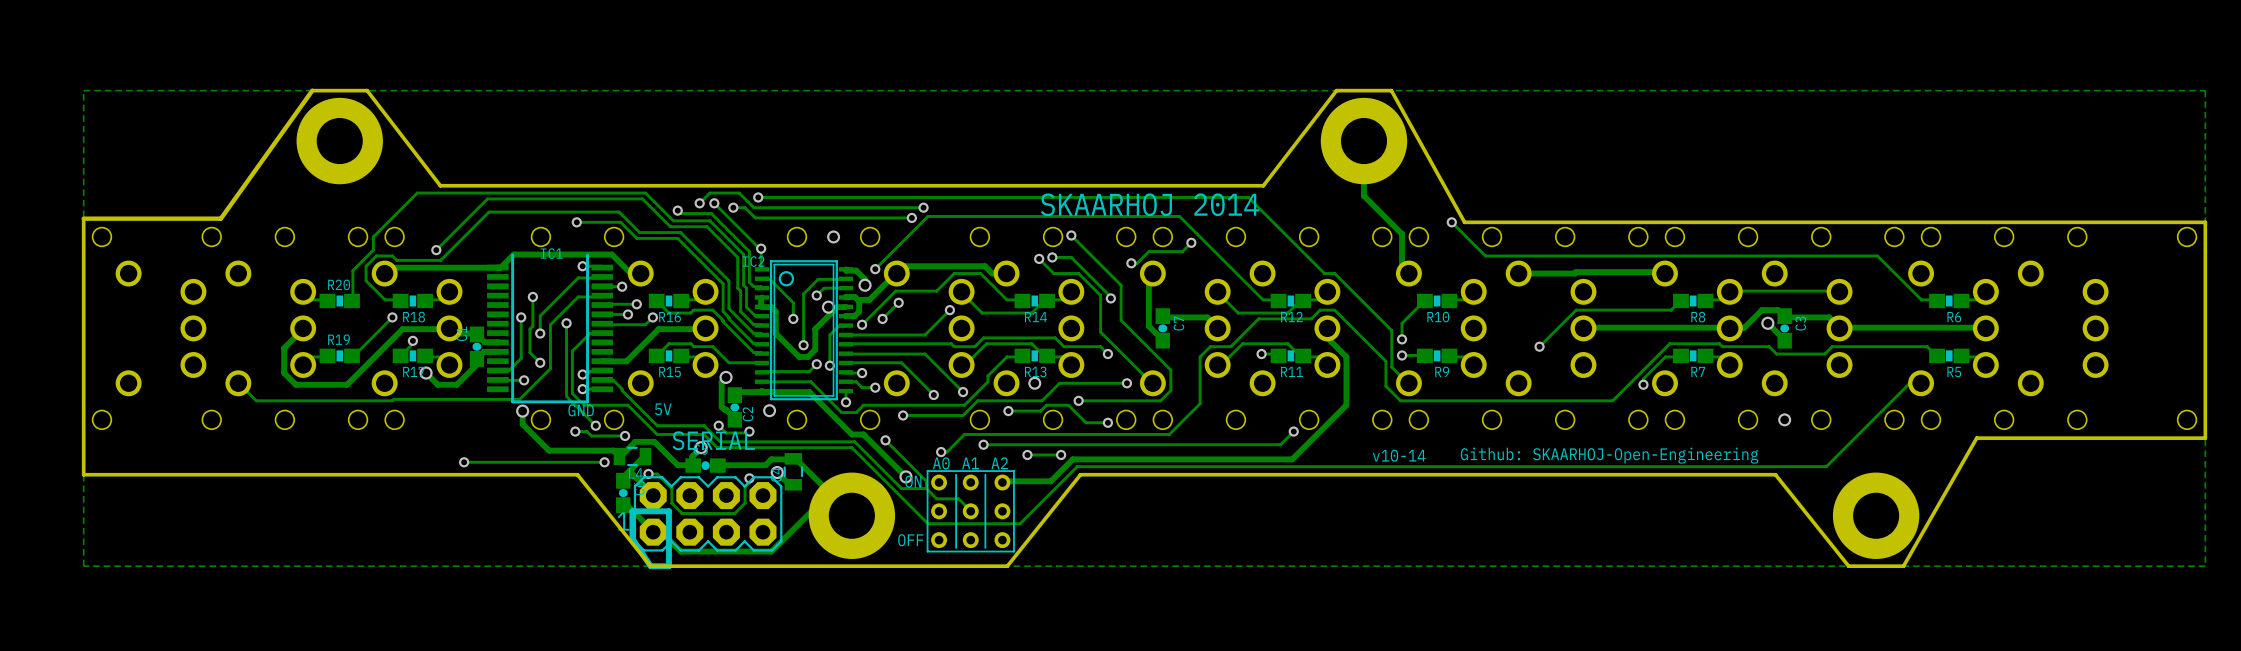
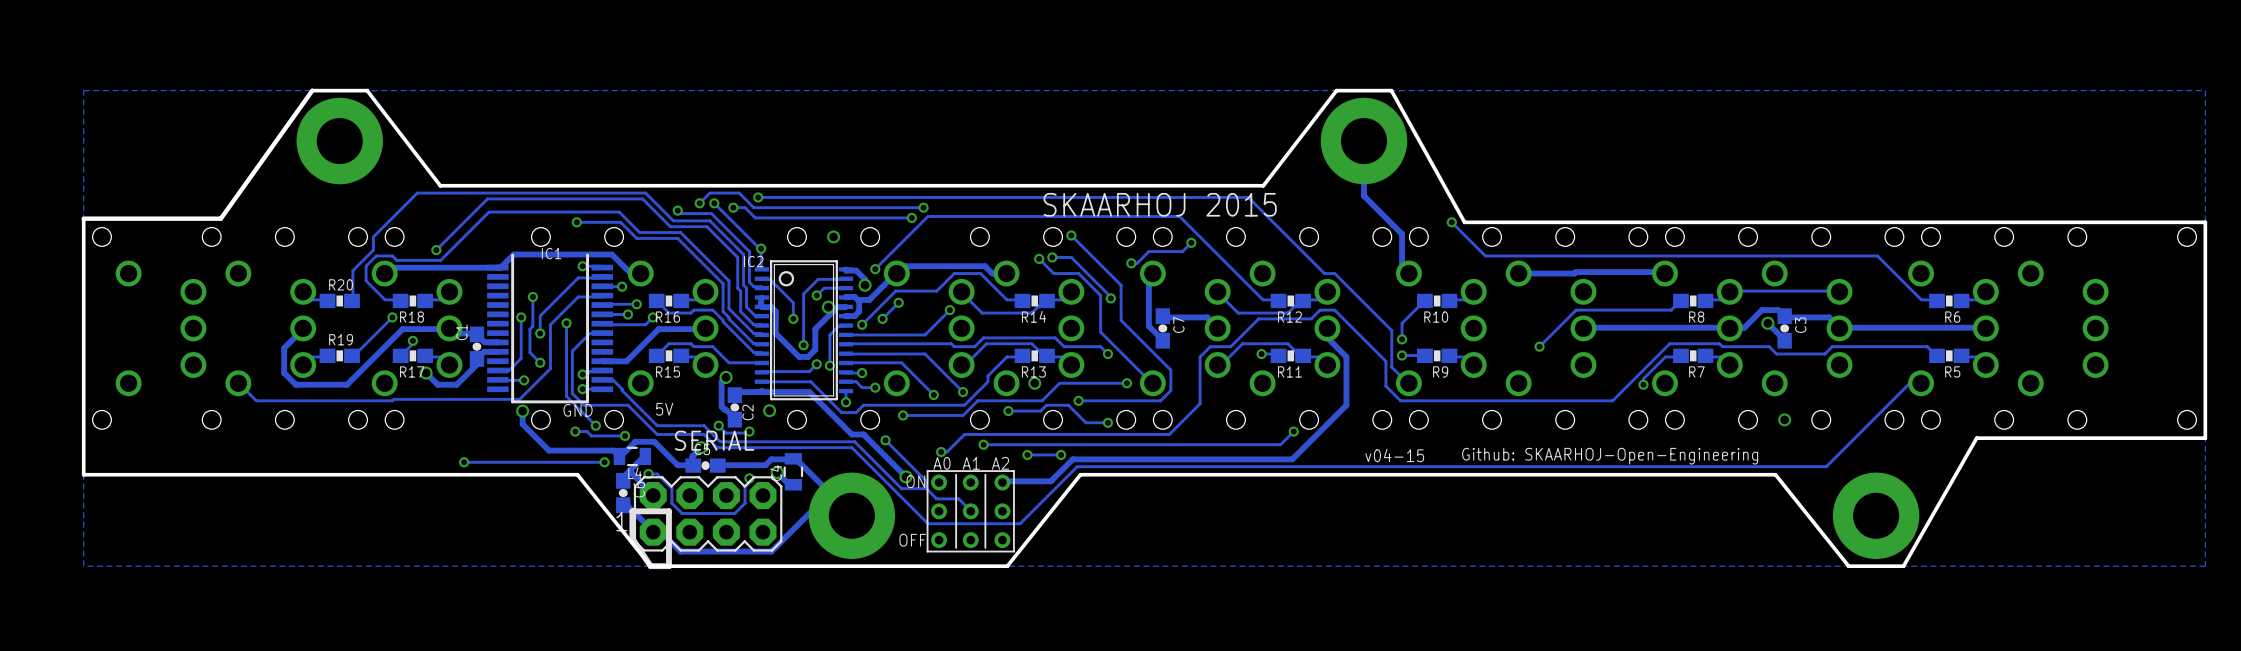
text: SKAARHOJ 2014 (1150, 204) -> SKAARHOJ 2015 (1160, 204)
text: v10-14 (1399, 455) -> v04-15 (1394, 455)

